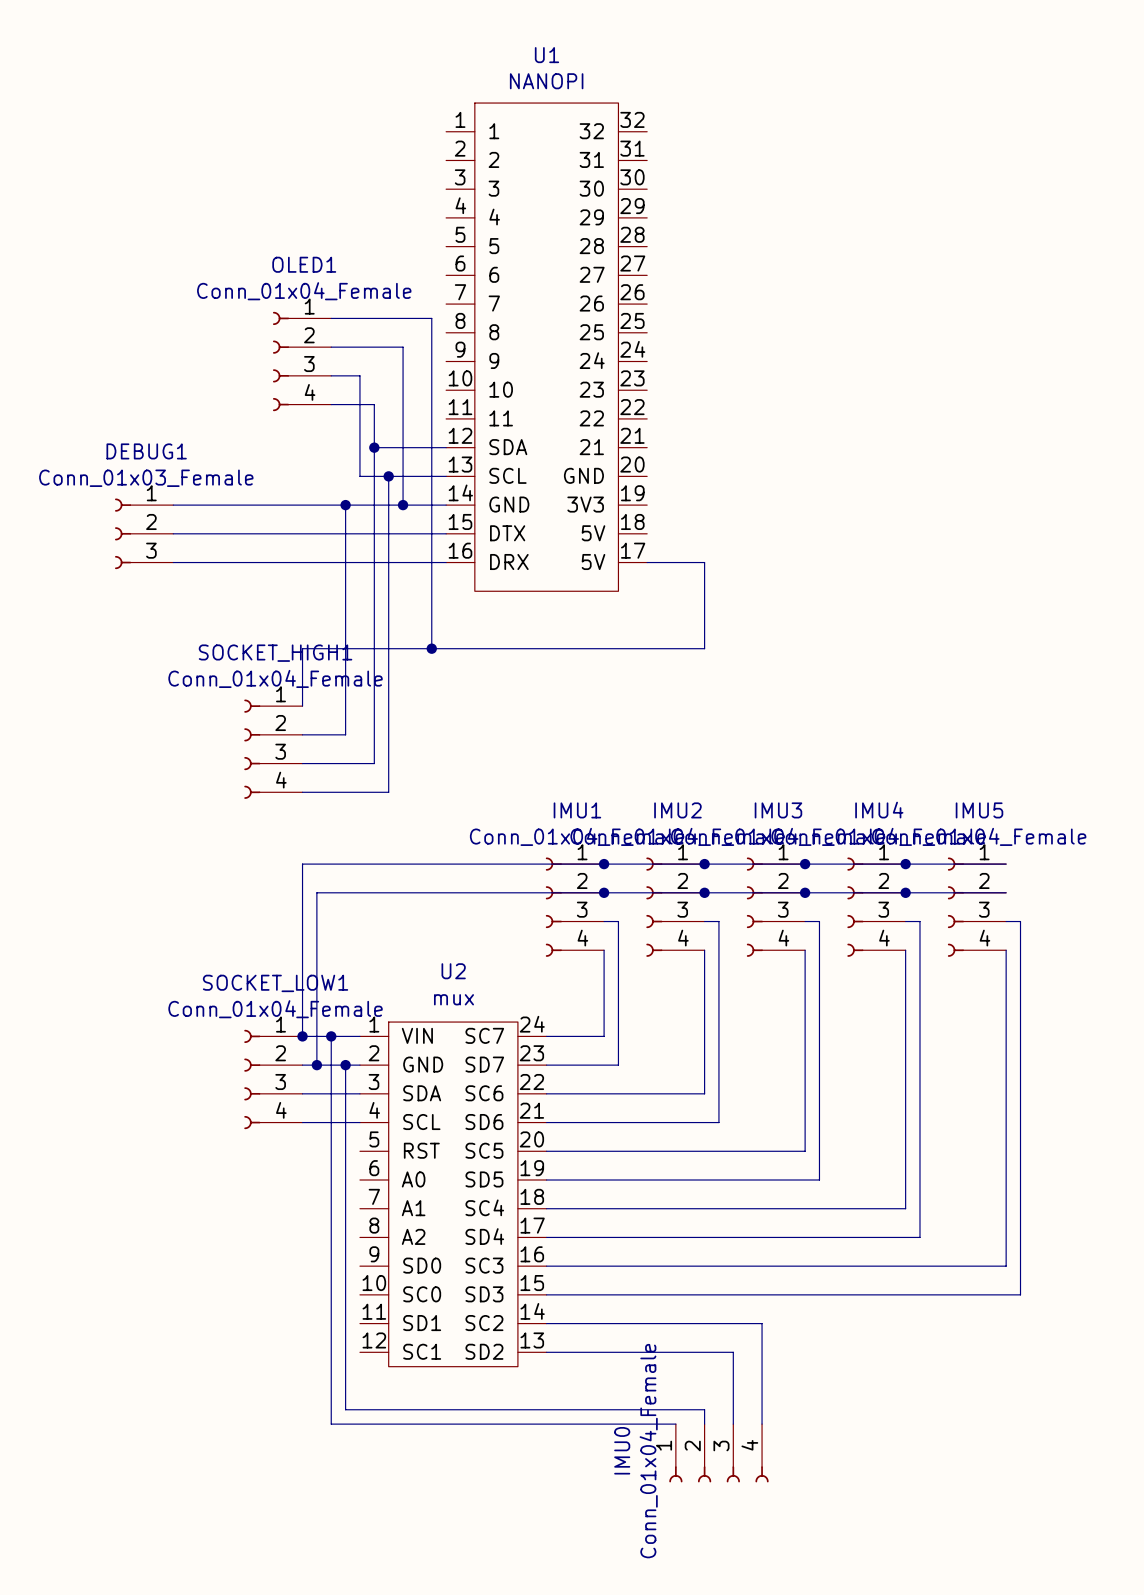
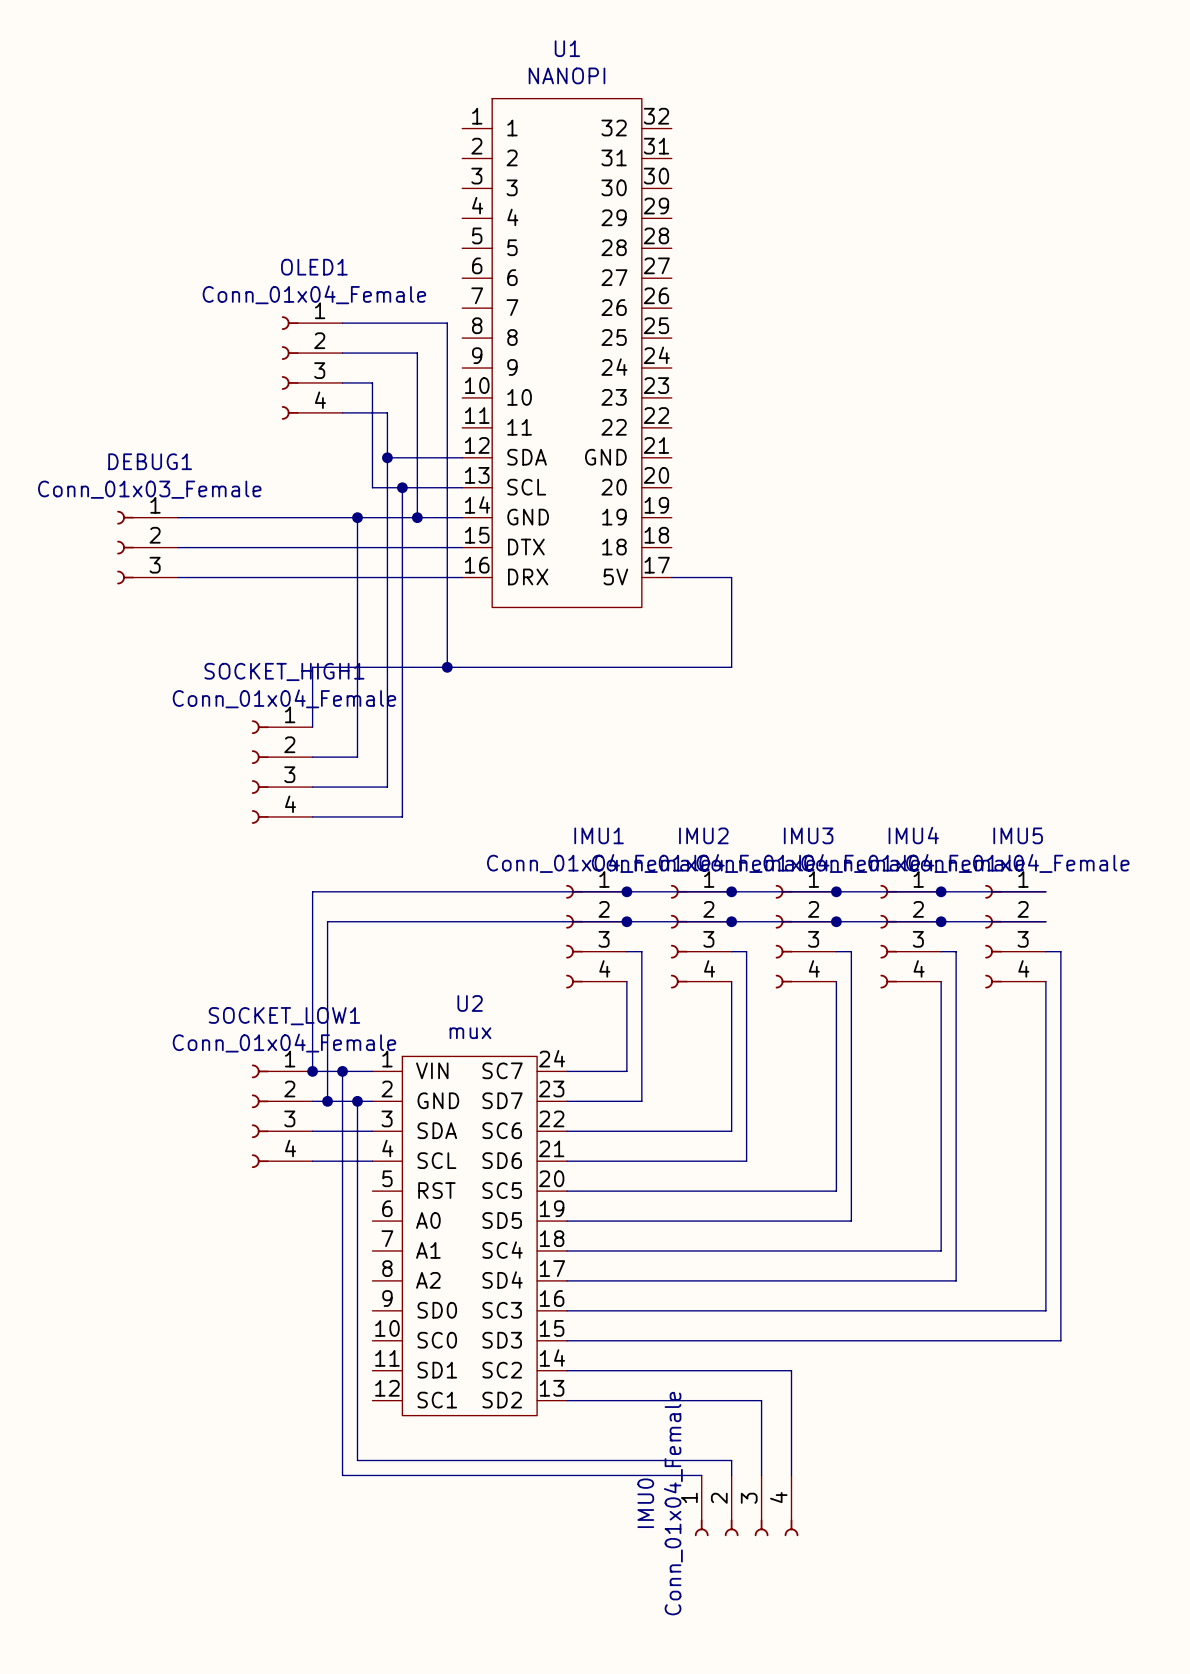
U1 pin name: 21 (591, 447) -> GND (605, 457)
U1 pin name: GND (583, 475) -> 20 (614, 487)
U1 pin name: 3V3 (585, 504) -> 19 (614, 517)
U1 pin name: 5V (593, 533) -> 18 (614, 547)

